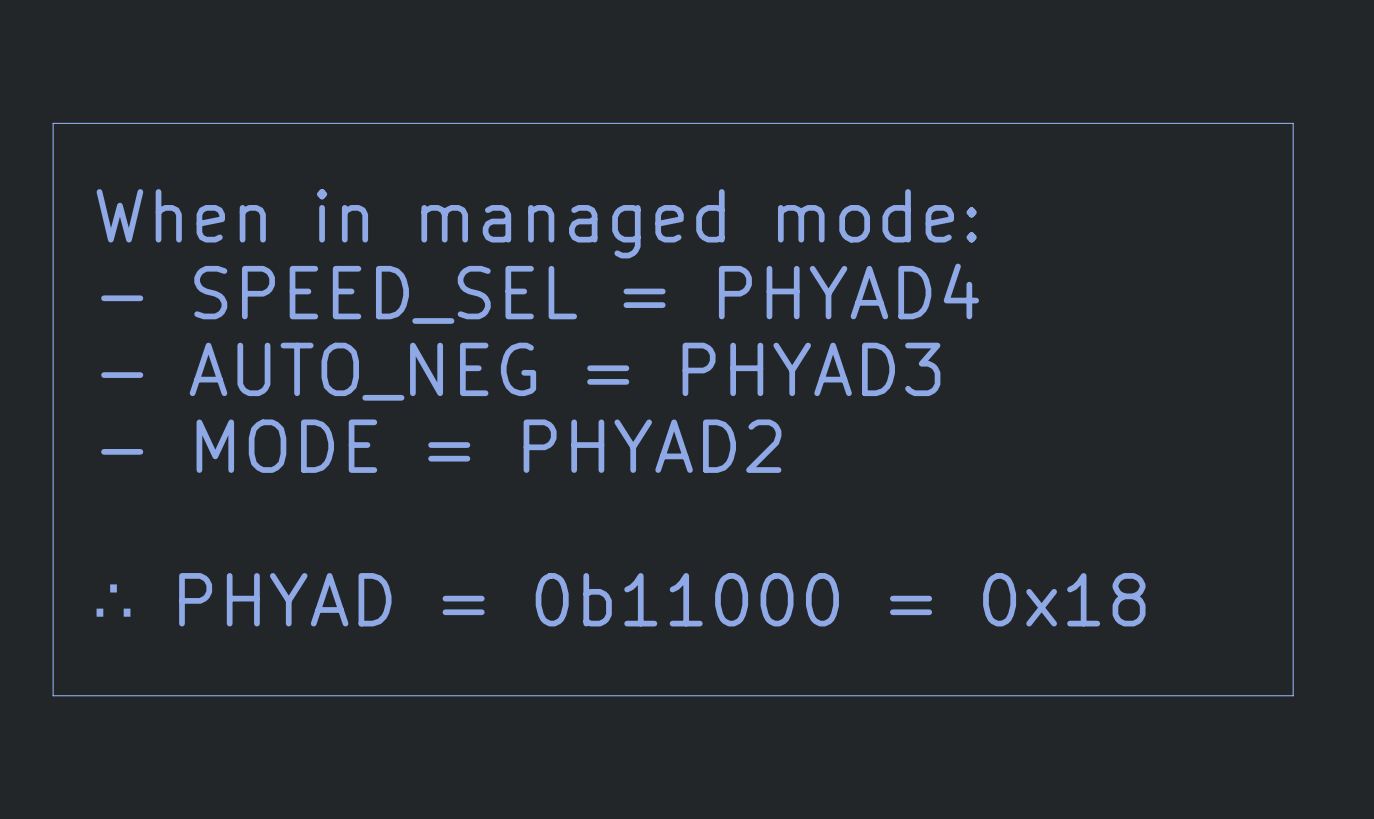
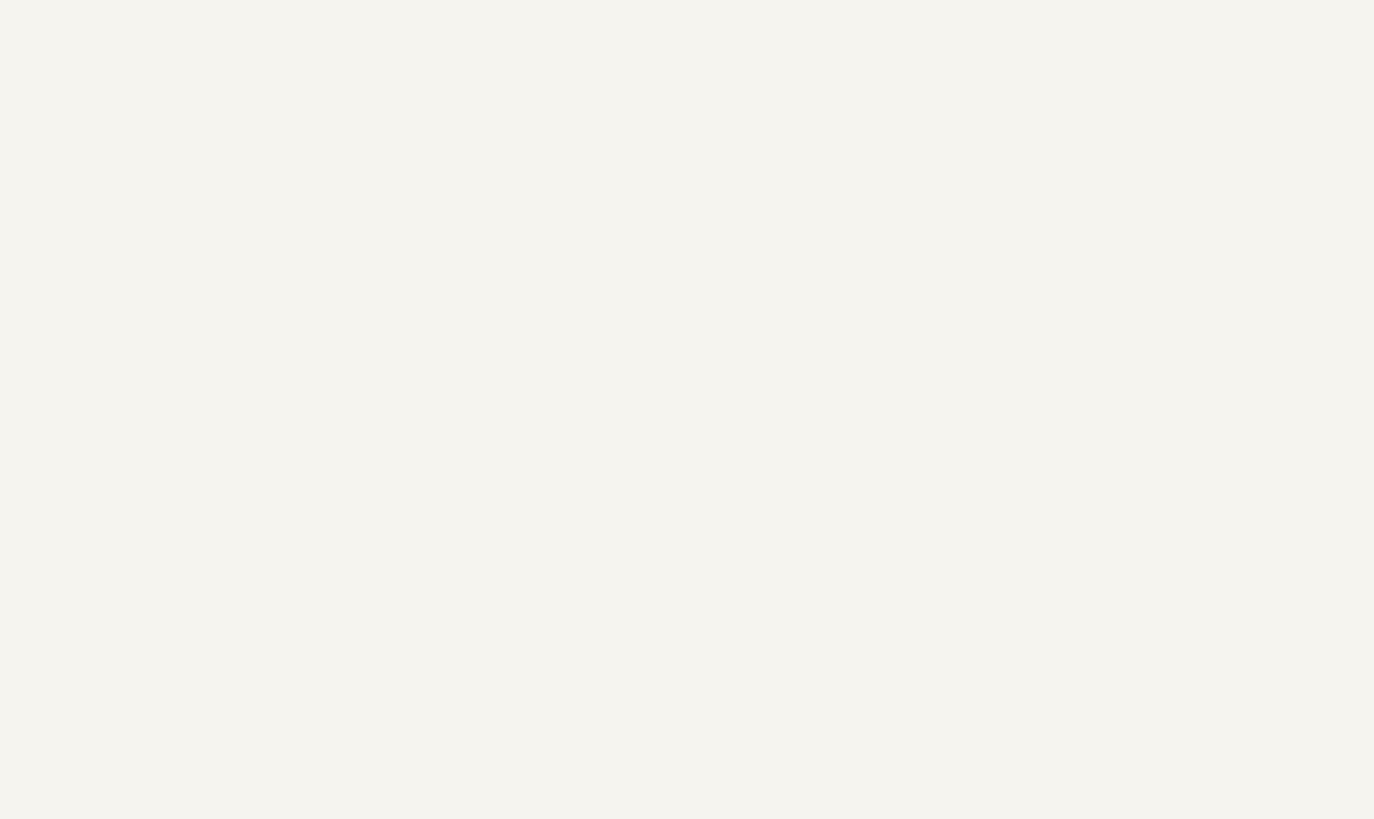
line: (53, 123) (1293, 123) (1293, 695) (53, 695) (53, 123) -> none
text: When in managed mode: (536, 223) -> none
text: - SPEED_SEL = PHYAD4 (540, 293) -> none
text: - AUTO_NEG = PHYAD3 (520, 371) -> none
text: - MODE = PHYAD2 (441, 446) -> none
text: ∴ PHYAD = 0b11000 = 0x18 (619, 599) -> none

